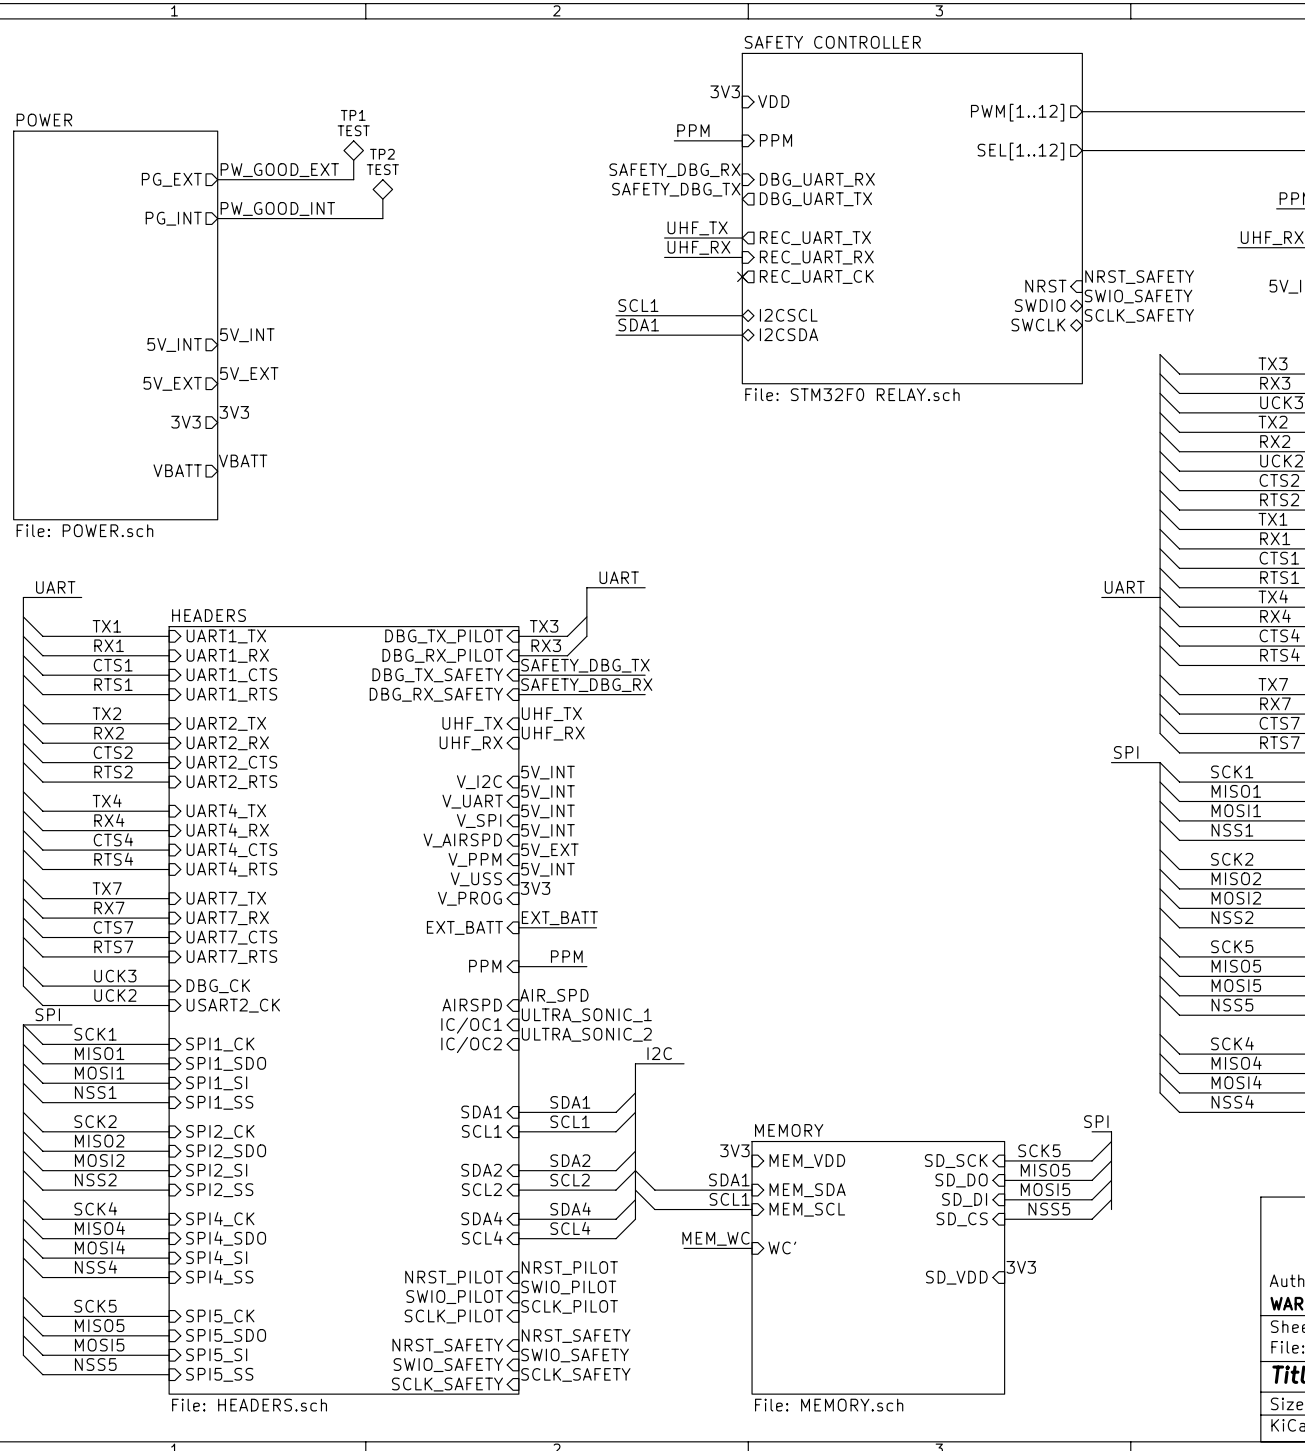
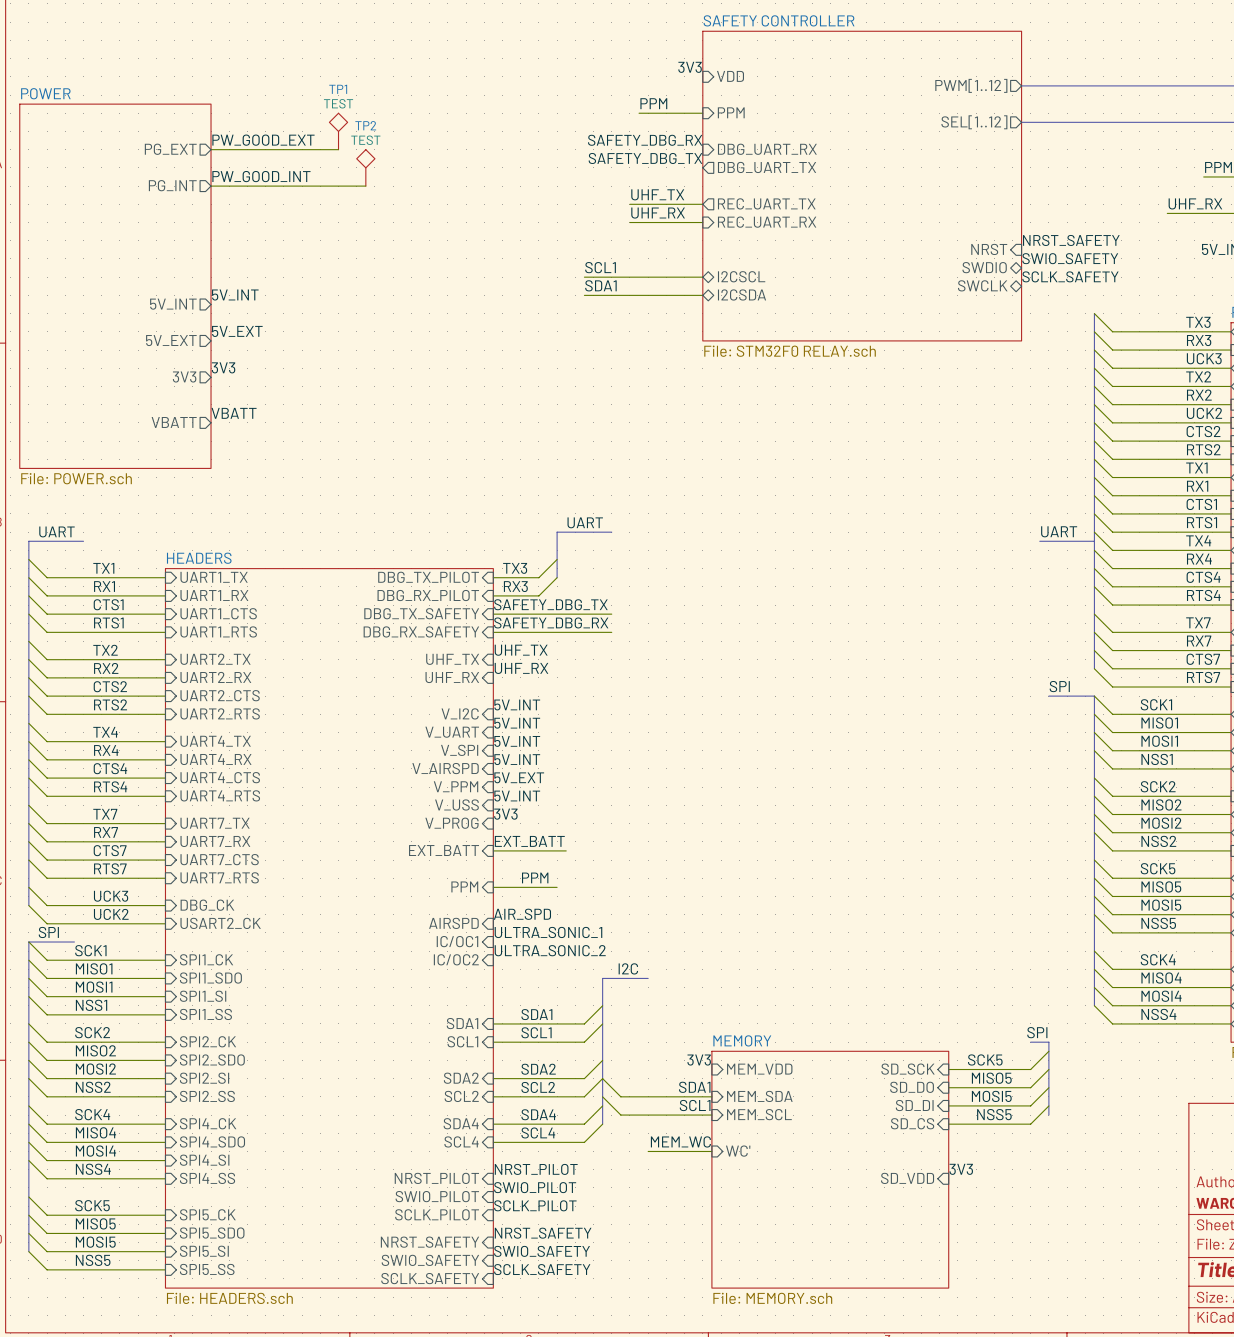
no-connect mark: (742, 276) -> none
sheet pin: REC_UART_CK (816, 276) -> none

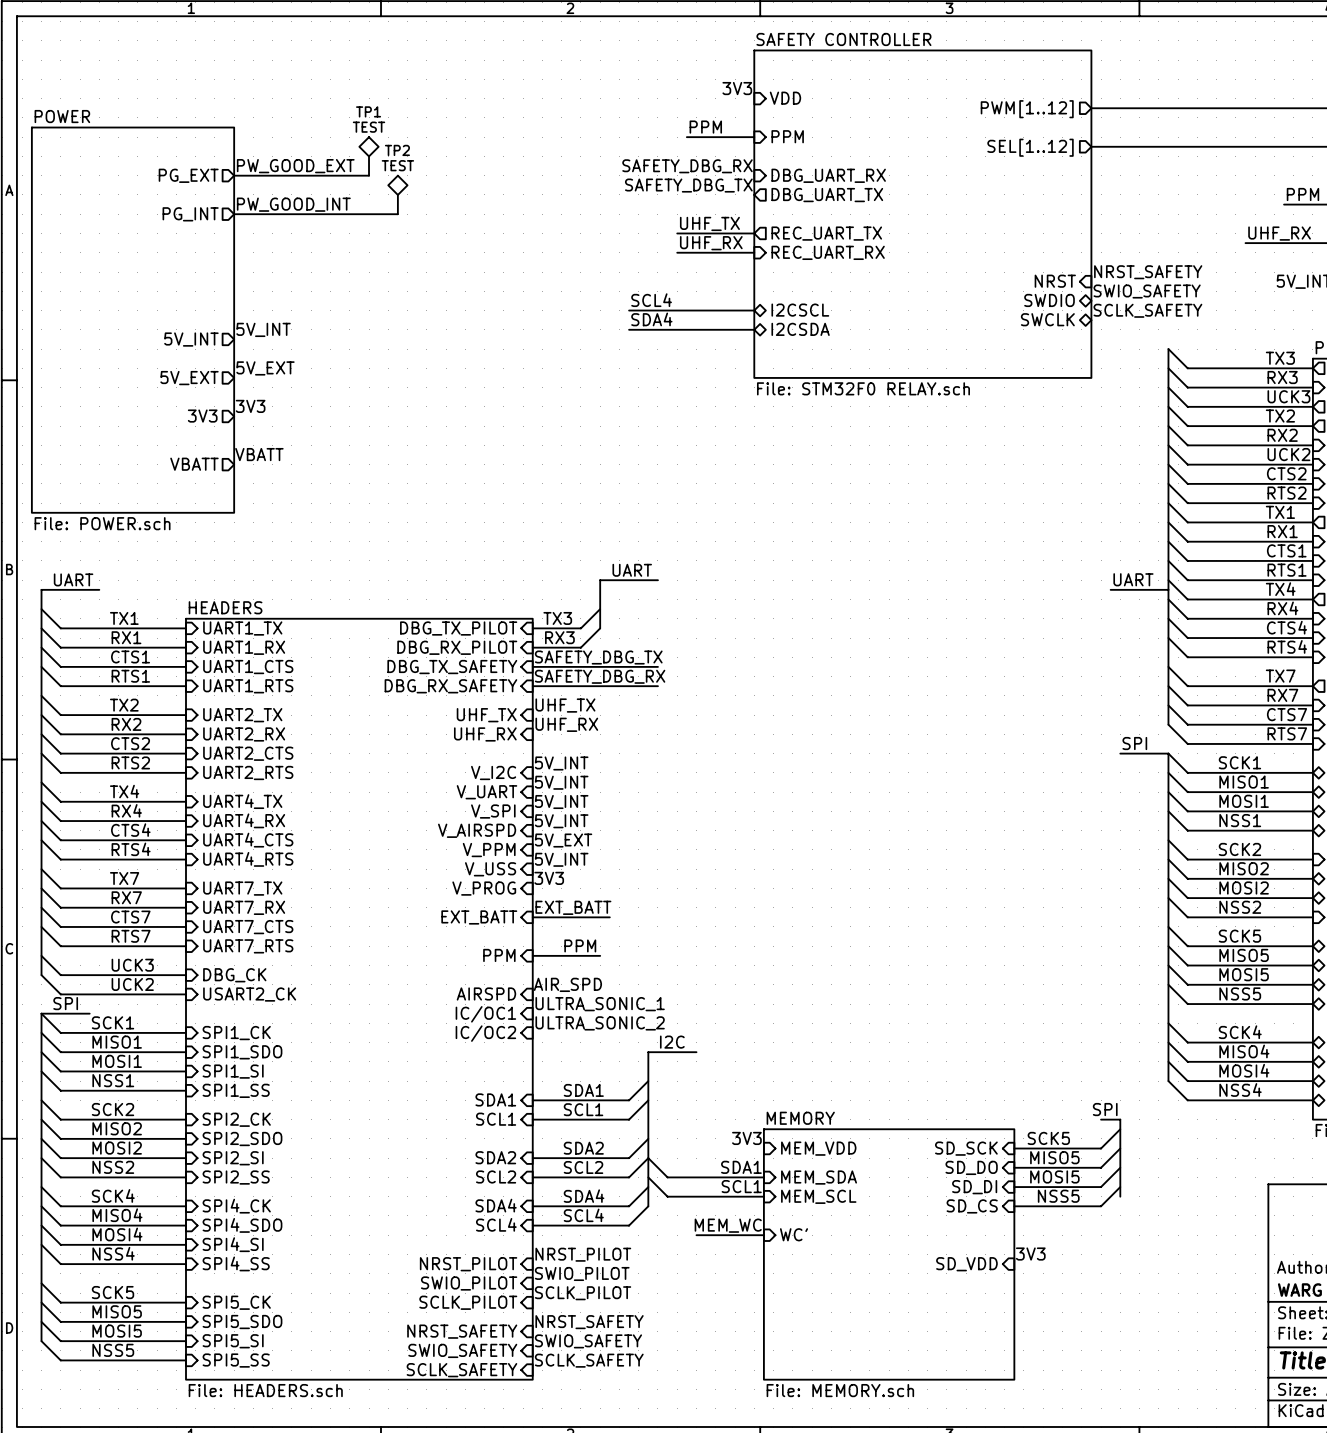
label: SCL1 (600, 267) -> SCL4 (651, 300)
label: SDA1 (600, 285) -> SDA4 (651, 319)

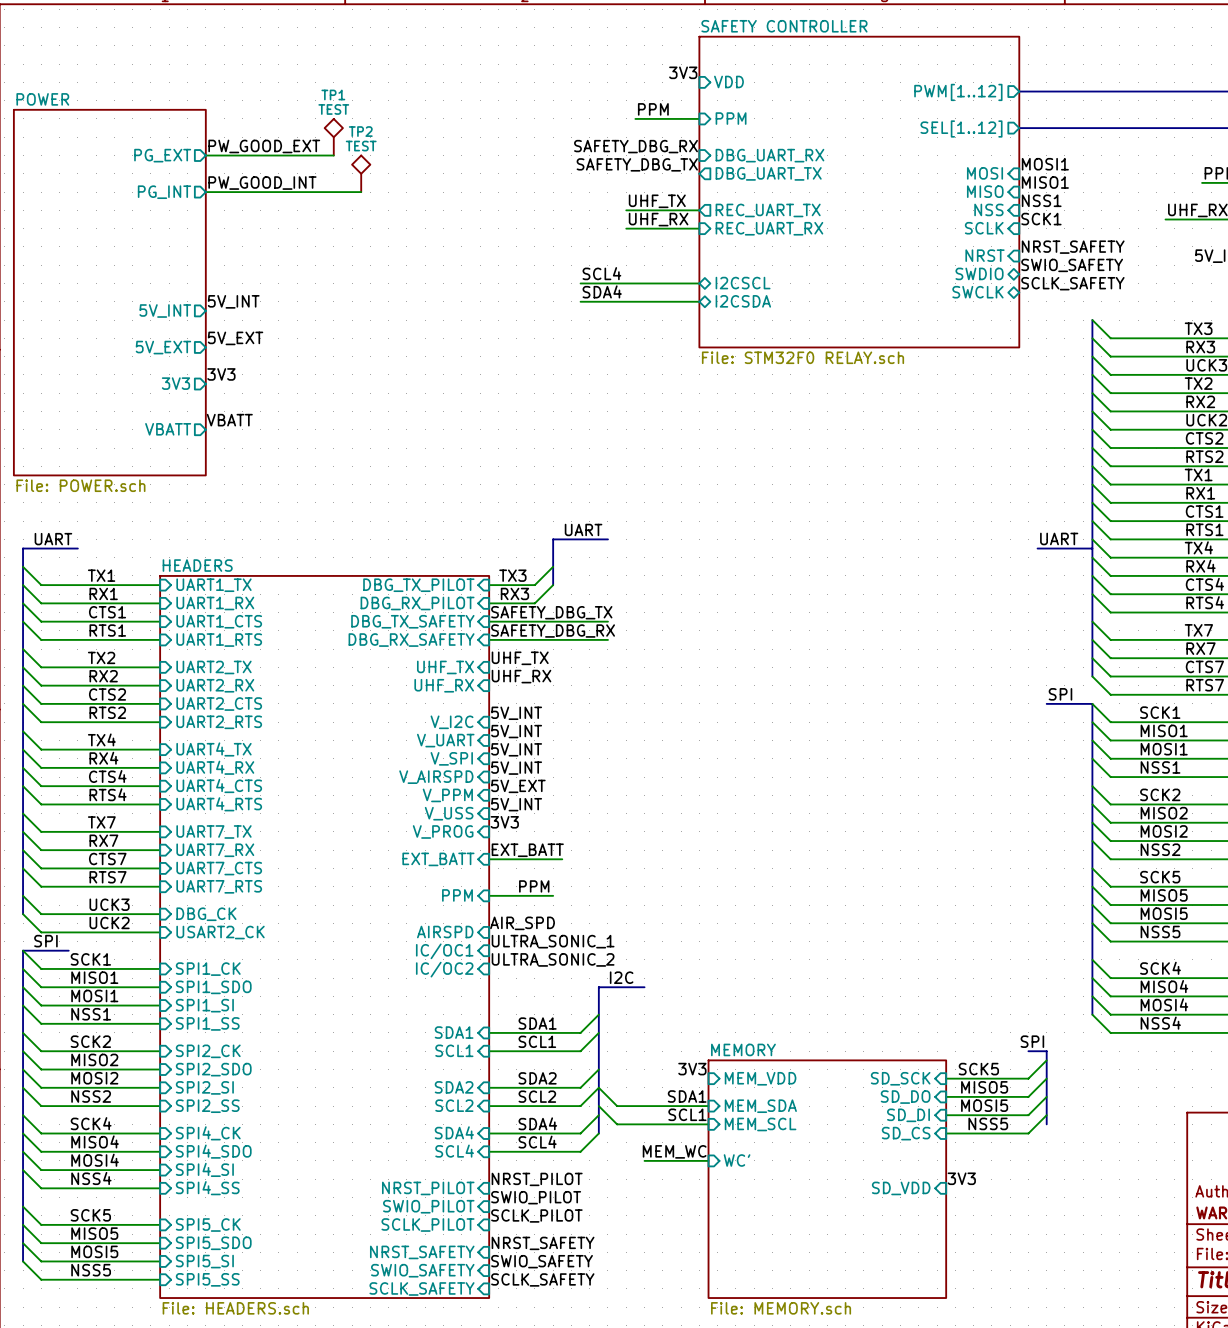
label: none -> MOSI1 (1045, 164)
sheet pin: none -> MOSI (985, 173)
label: none -> MISO1 (1045, 182)
sheet pin: none -> MISO (985, 191)
label: none -> NSS1 (1041, 200)
sheet pin: none -> NSS (988, 209)
label: none -> SCK1 (1041, 219)
sheet pin: none -> SCLK (984, 228)

